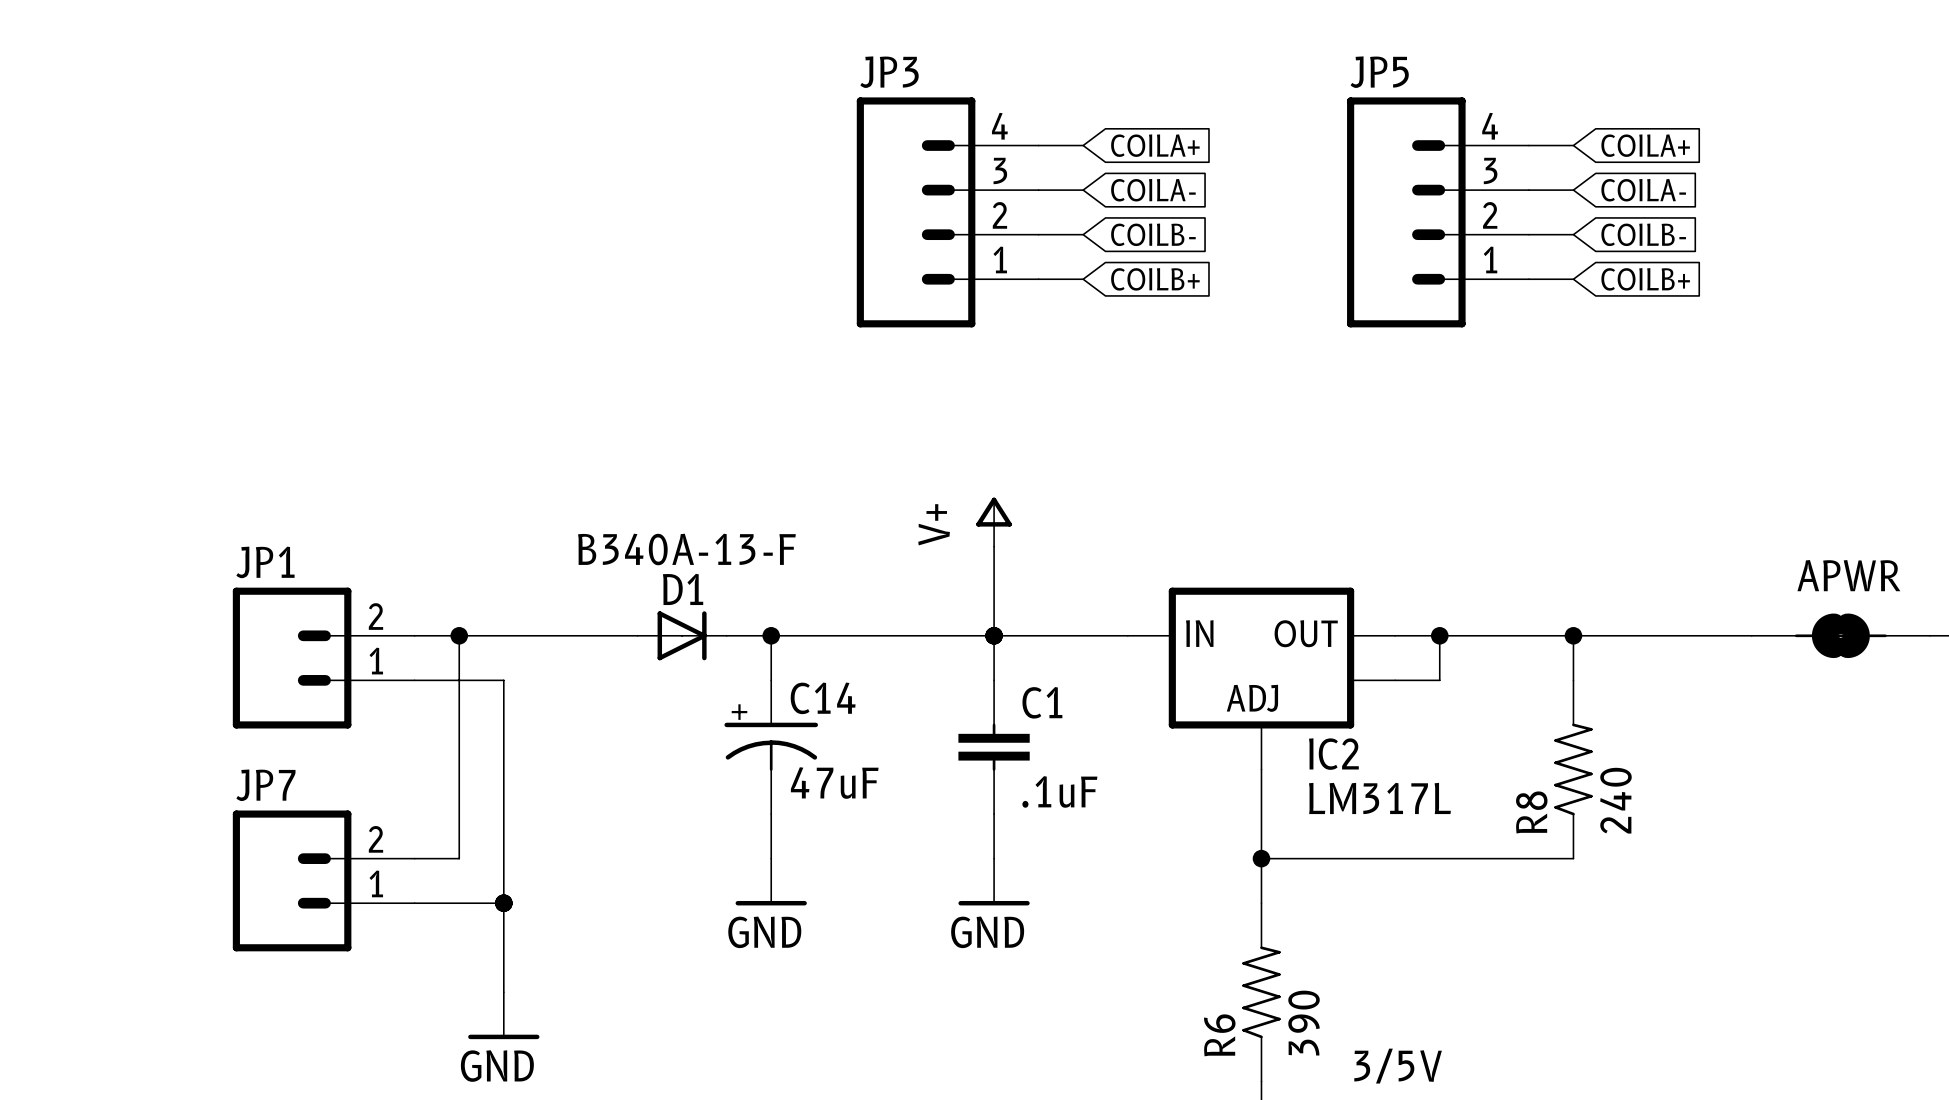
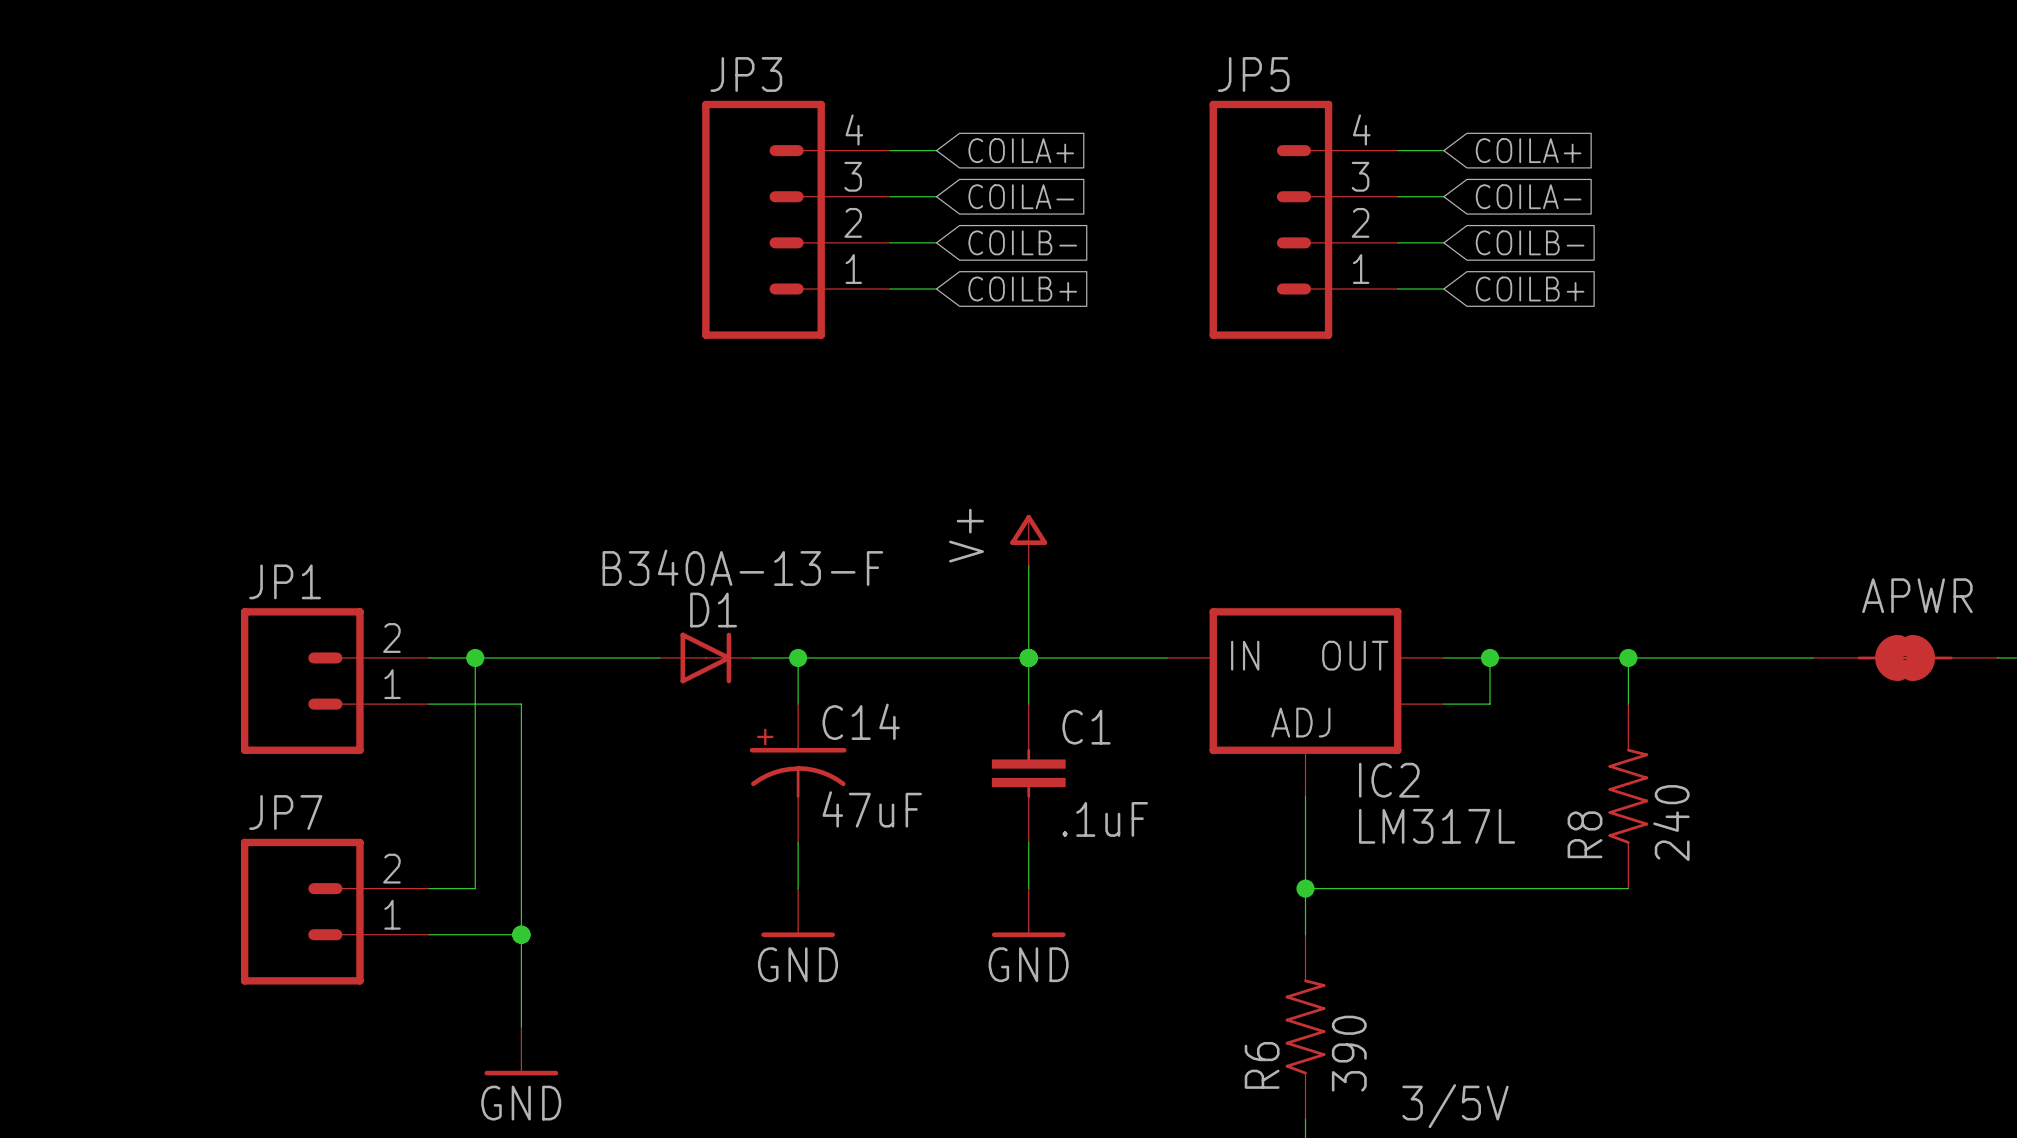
global label: none -> COILA+ (1021, 150)
wire: (1038, 145) (1083, 145) -> (890, 150) (936, 150)
global label: COILA+ (1155, 145) -> none
global label: none -> COILA+ (1528, 150)
wire: (1528, 145) (1573, 145) -> (1397, 150) (1443, 150)
global label: COILA+ (1645, 145) -> none
global label: none -> COILA- (1021, 196)
wire: (1038, 190) (1083, 190) -> (890, 196) (936, 196)
global label: COILA- (1153, 190) -> none
global label: none -> COILA- (1528, 196)
wire: (1528, 190) (1573, 190) -> (1397, 196) (1443, 196)
global label: COILA- (1643, 190) -> none
JP3 position: (947, 212) -> (796, 219)
JP5 position: (1437, 212) -> (1303, 219)
global label: none -> COILB- (1022, 242)
wire: (1038, 234) (1083, 234) -> (890, 242) (936, 242)
global label: COILB- (1153, 234) -> none
global label: none -> COILB- (1530, 242)
wire: (1528, 234) (1573, 234) -> (1397, 242) (1443, 242)
global label: COILB- (1643, 234) -> none
global label: none -> COILB+ (1022, 288)
wire: (1038, 279) (1083, 279) -> (890, 288) (936, 288)
global label: COILB+ (1155, 279) -> none
global label: none -> COILB+ (1530, 288)
wire: (1528, 279) (1573, 279) -> (1397, 288) (1443, 288)
global label: COILB+ (1645, 279) -> none

